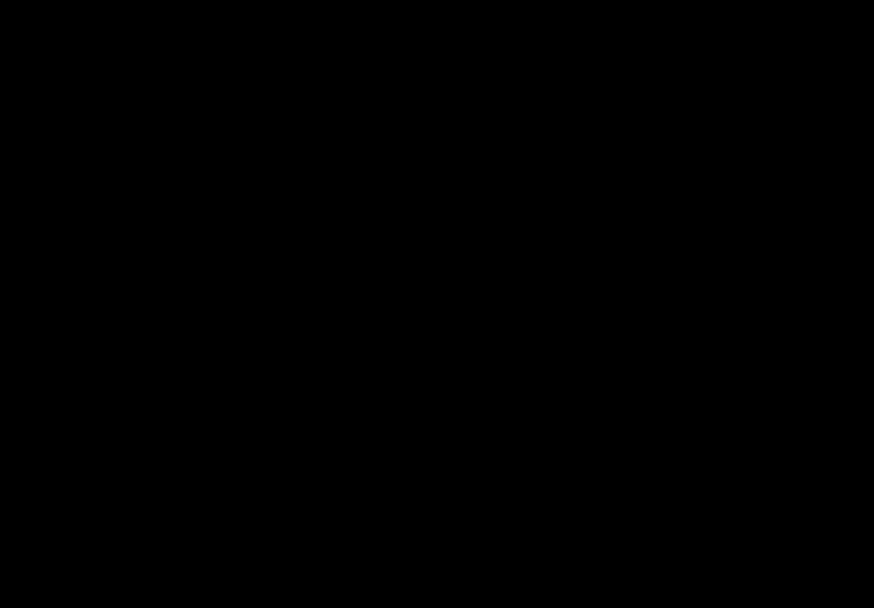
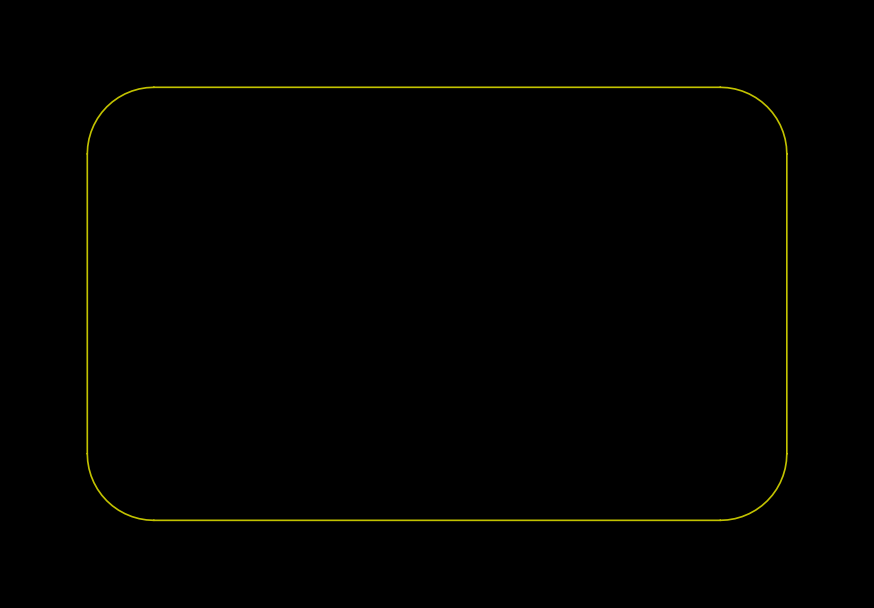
board edge: none -> (720, 87) (153, 87) (139, 88) (118, 97) (106, 106) (97, 118) (91, 131) (87, 153) (87, 453) (91, 475) (97, 489) (106, 500) (125, 513) (139, 518) (153, 520) (720, 520) (742, 516) (755, 510) (767, 500) (776, 489) (783, 475) (786, 461) (786, 146) (780, 125) (767, 106) (749, 93) (735, 88) (720, 87)

